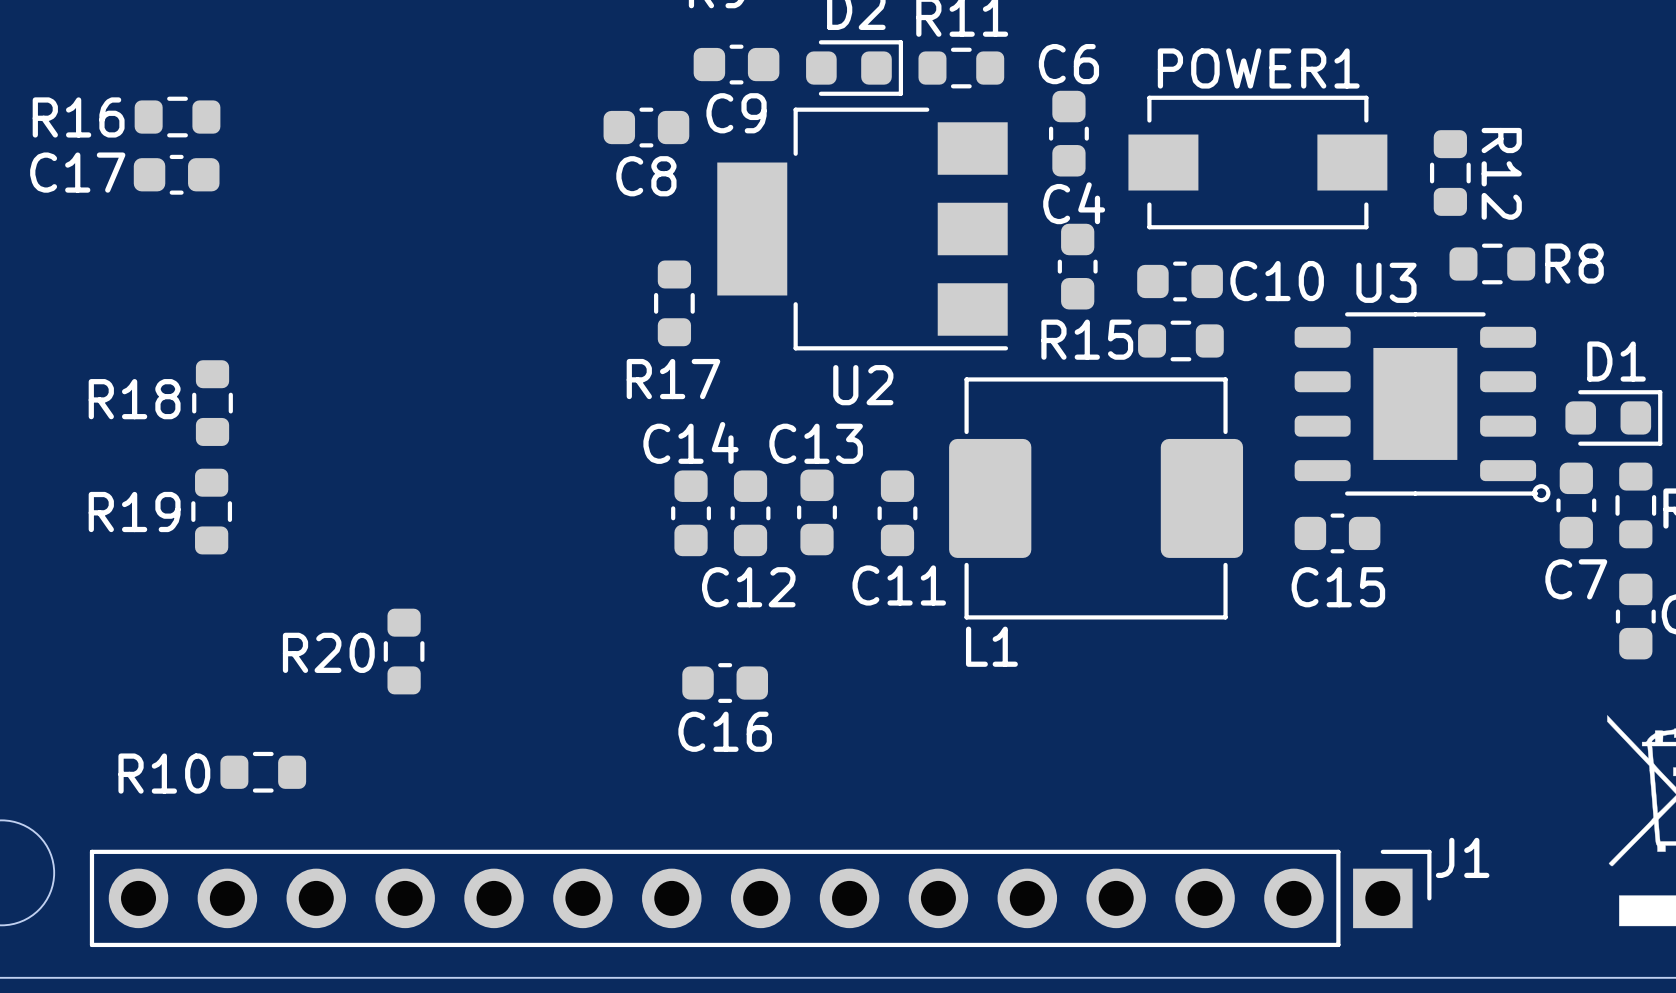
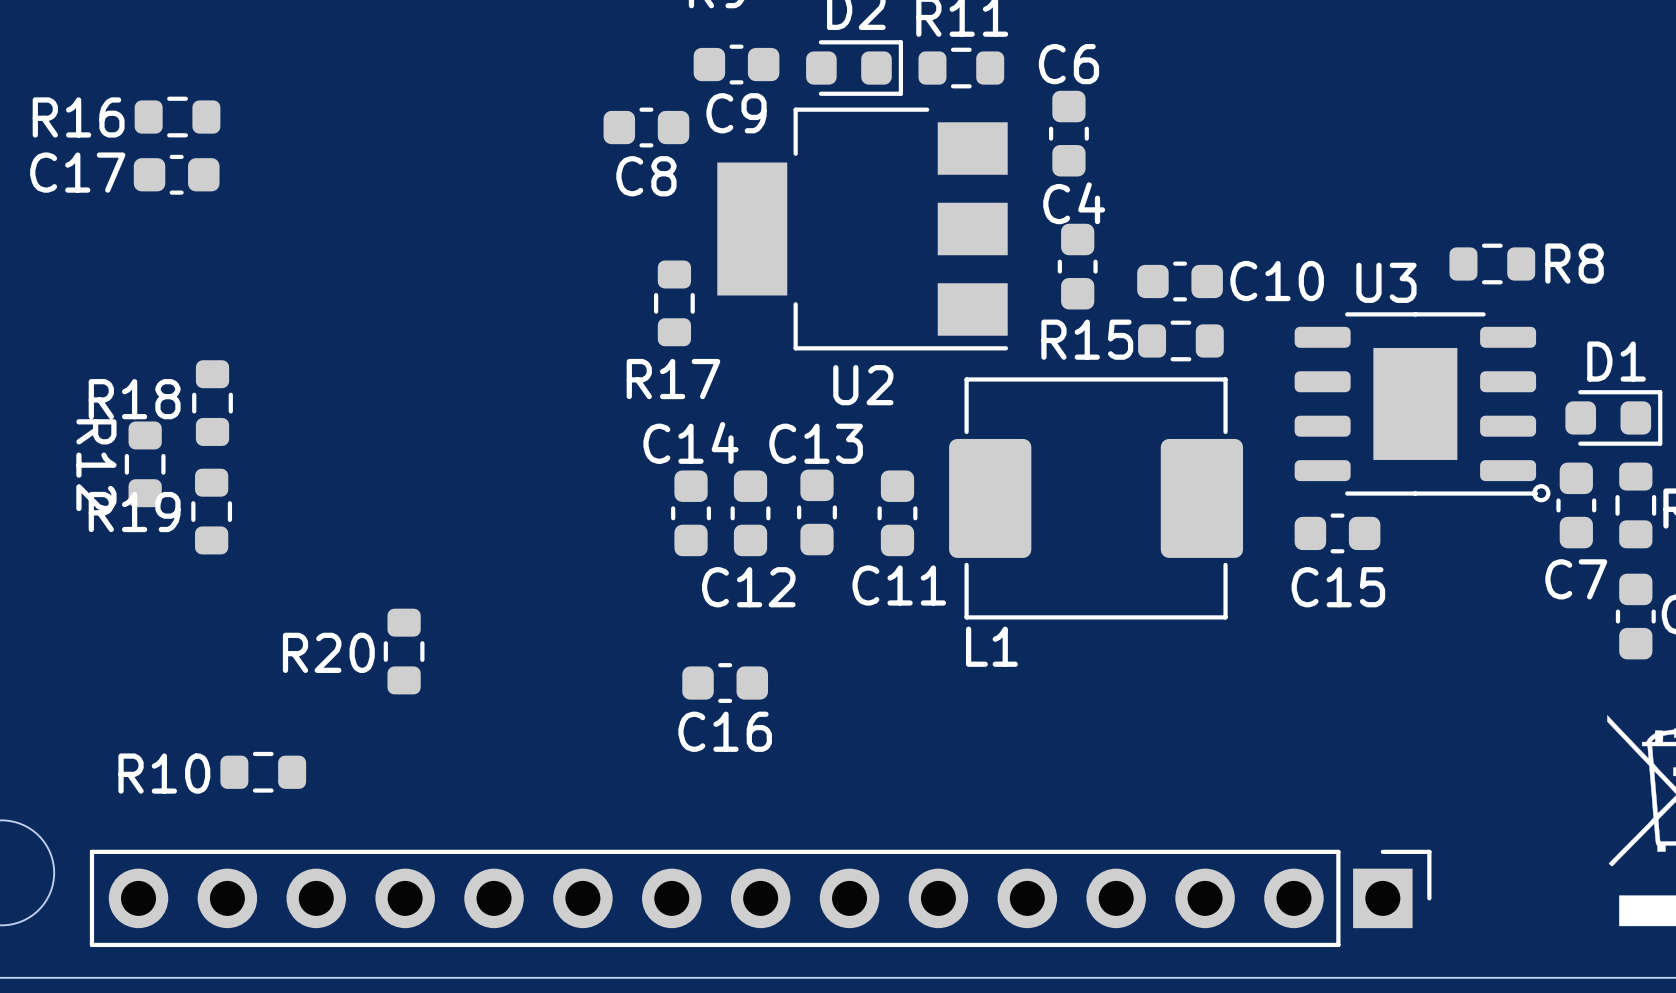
POWER1: (1257, 162) -> none
R12 position: (1450, 173) -> (145, 464)
R12 name position: R12 (1501, 173) -> R12 (96, 465)
J1 name: J1 (1462, 857) -> none

